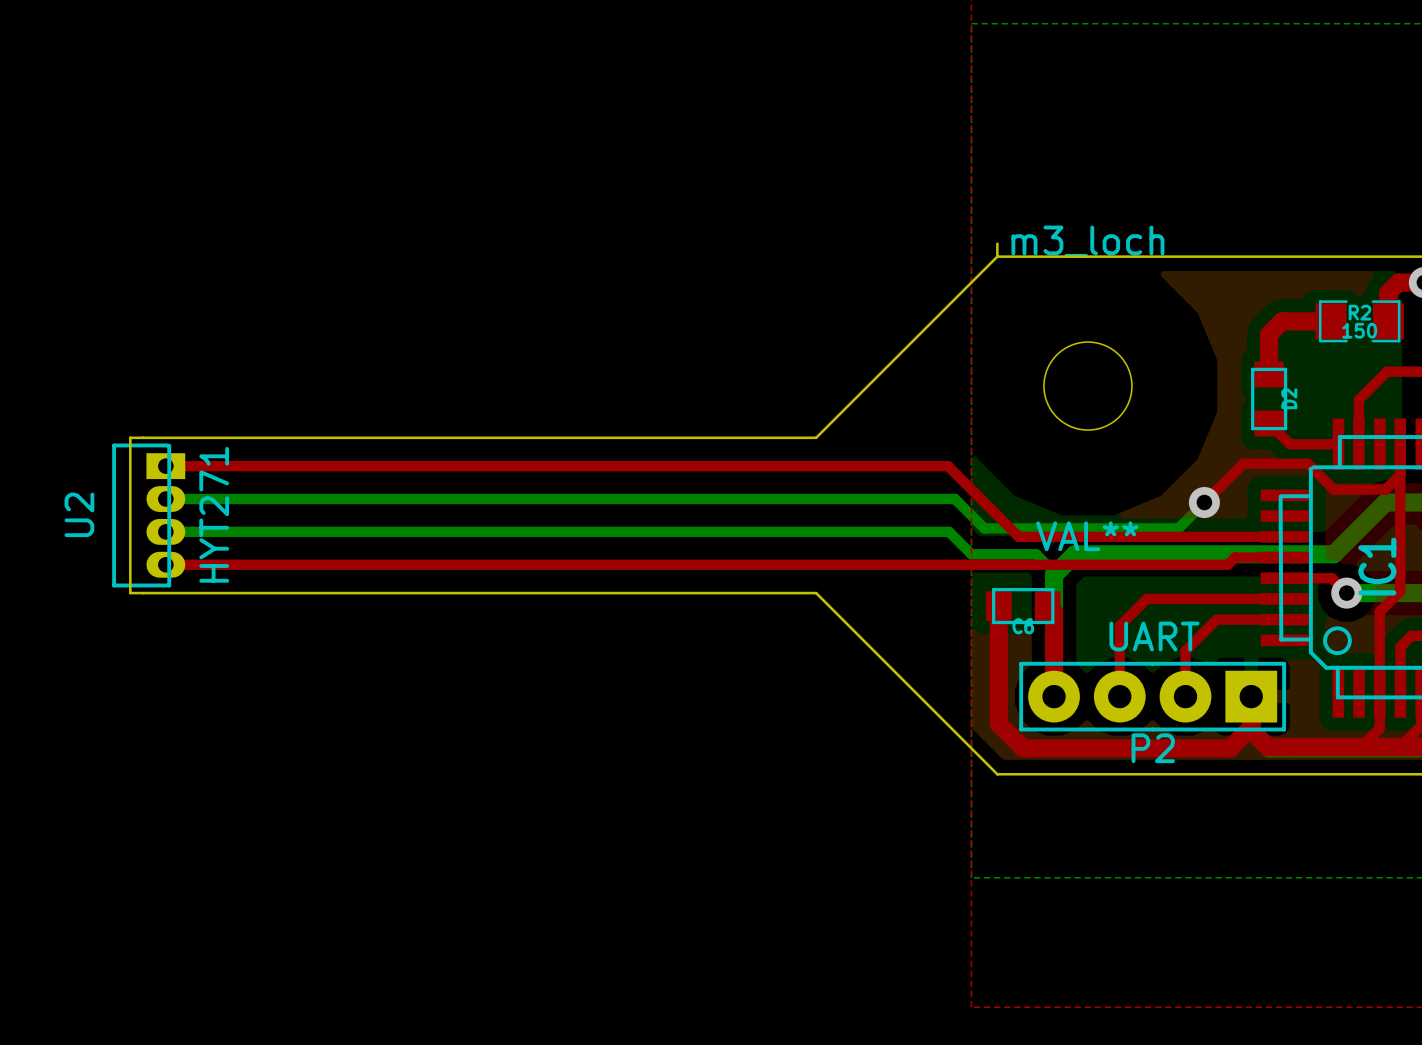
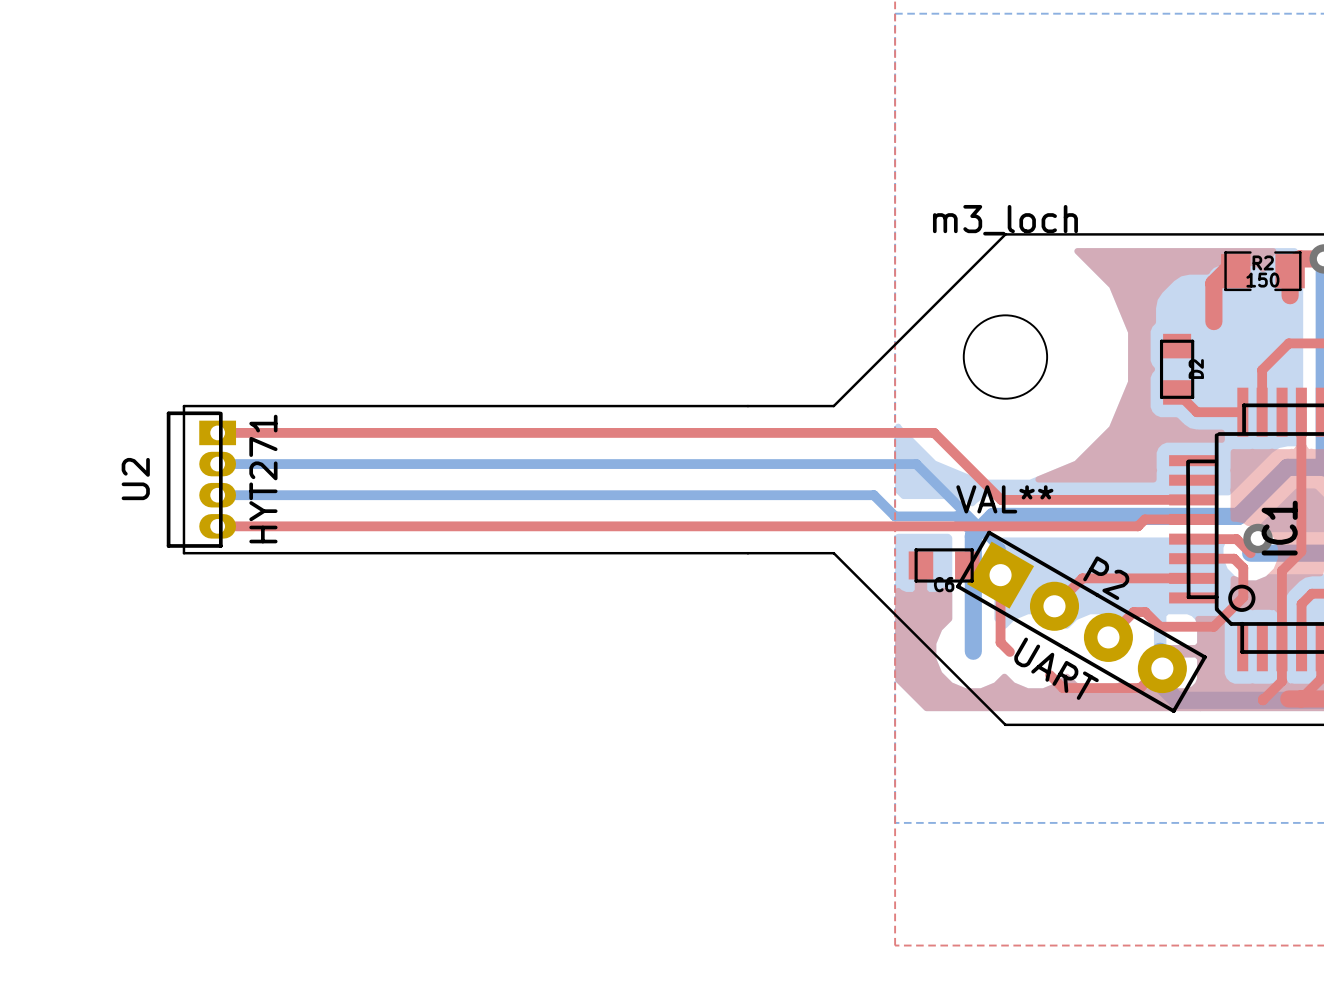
board edge: (997, 243) (997, 256) -> none
board edge: (997, 256) (816, 437) -> (1005, 234) (833, 406) (747, 406)
board edge: (997, 256) (1087, 256) -> none
top track: none -> (1235, 271) (1226, 271) (1213, 283) (1213, 321)
top track: (1331, 321) (1282, 321) (1269, 334) (1269, 374) -> none
R2 position: (1359, 321) -> (1262, 271)
board edge: (220, 437) (130, 437) (130, 593) (220, 593) -> (183, 406) (183, 553)
top track: (165, 466) (256, 466) -> none
top track: (948, 466) (1018, 536) (1083, 536) -> (872, 432) (934, 432) (1001, 499)
top track: (1400, 474) (1385, 489) (1333, 489) (1307, 463) (1243, 463) (1204, 502) -> none
bottom track: (165, 499) (256, 499) -> none
bottom track: (955, 499) (984, 528) (1178, 528) (1204, 502) -> (879, 464) (916, 464) (1000, 548) (1000, 575)
via: (1204, 502) -> none
U2 position: (148, 515) -> (201, 479)
bottom track: (165, 531) (256, 531) -> none
top track: (165, 564) (256, 564) -> none
board edge: (816, 593) (997, 774) (1087, 774) -> (747, 553) (833, 553) (1005, 724)
via position: (1346, 593) -> (1258, 538)
top track: (1286, 598) (1146, 598) (1119, 625) (1119, 696) -> (1193, 558) (1234, 558) (1243, 567) (1243, 597) (1213, 626) (1159, 626) (1145, 612) (1133, 612) (1108, 637)
top track: (998, 606) (998, 723) (1023, 748) (1230, 748) (1251, 727) -> none
top track: (1047, 606) (1054, 612) (1054, 696) -> none
top track: none -> (1000, 575) (1000, 642) (1009, 651)
top track: (1216, 619) (1185, 650) (1185, 696) -> (1127, 578) (1082, 578) (1054, 606)
P2 rotation: 0° (1152, 696) -> 150° counterclockwise (1081, 621)
top track: (1251, 696) (1251, 730) (1267, 746) (1384, 746) -> none
top track: none -> (1162, 668) (1159, 668) (1140, 688) (1062, 688) (1050, 675)

